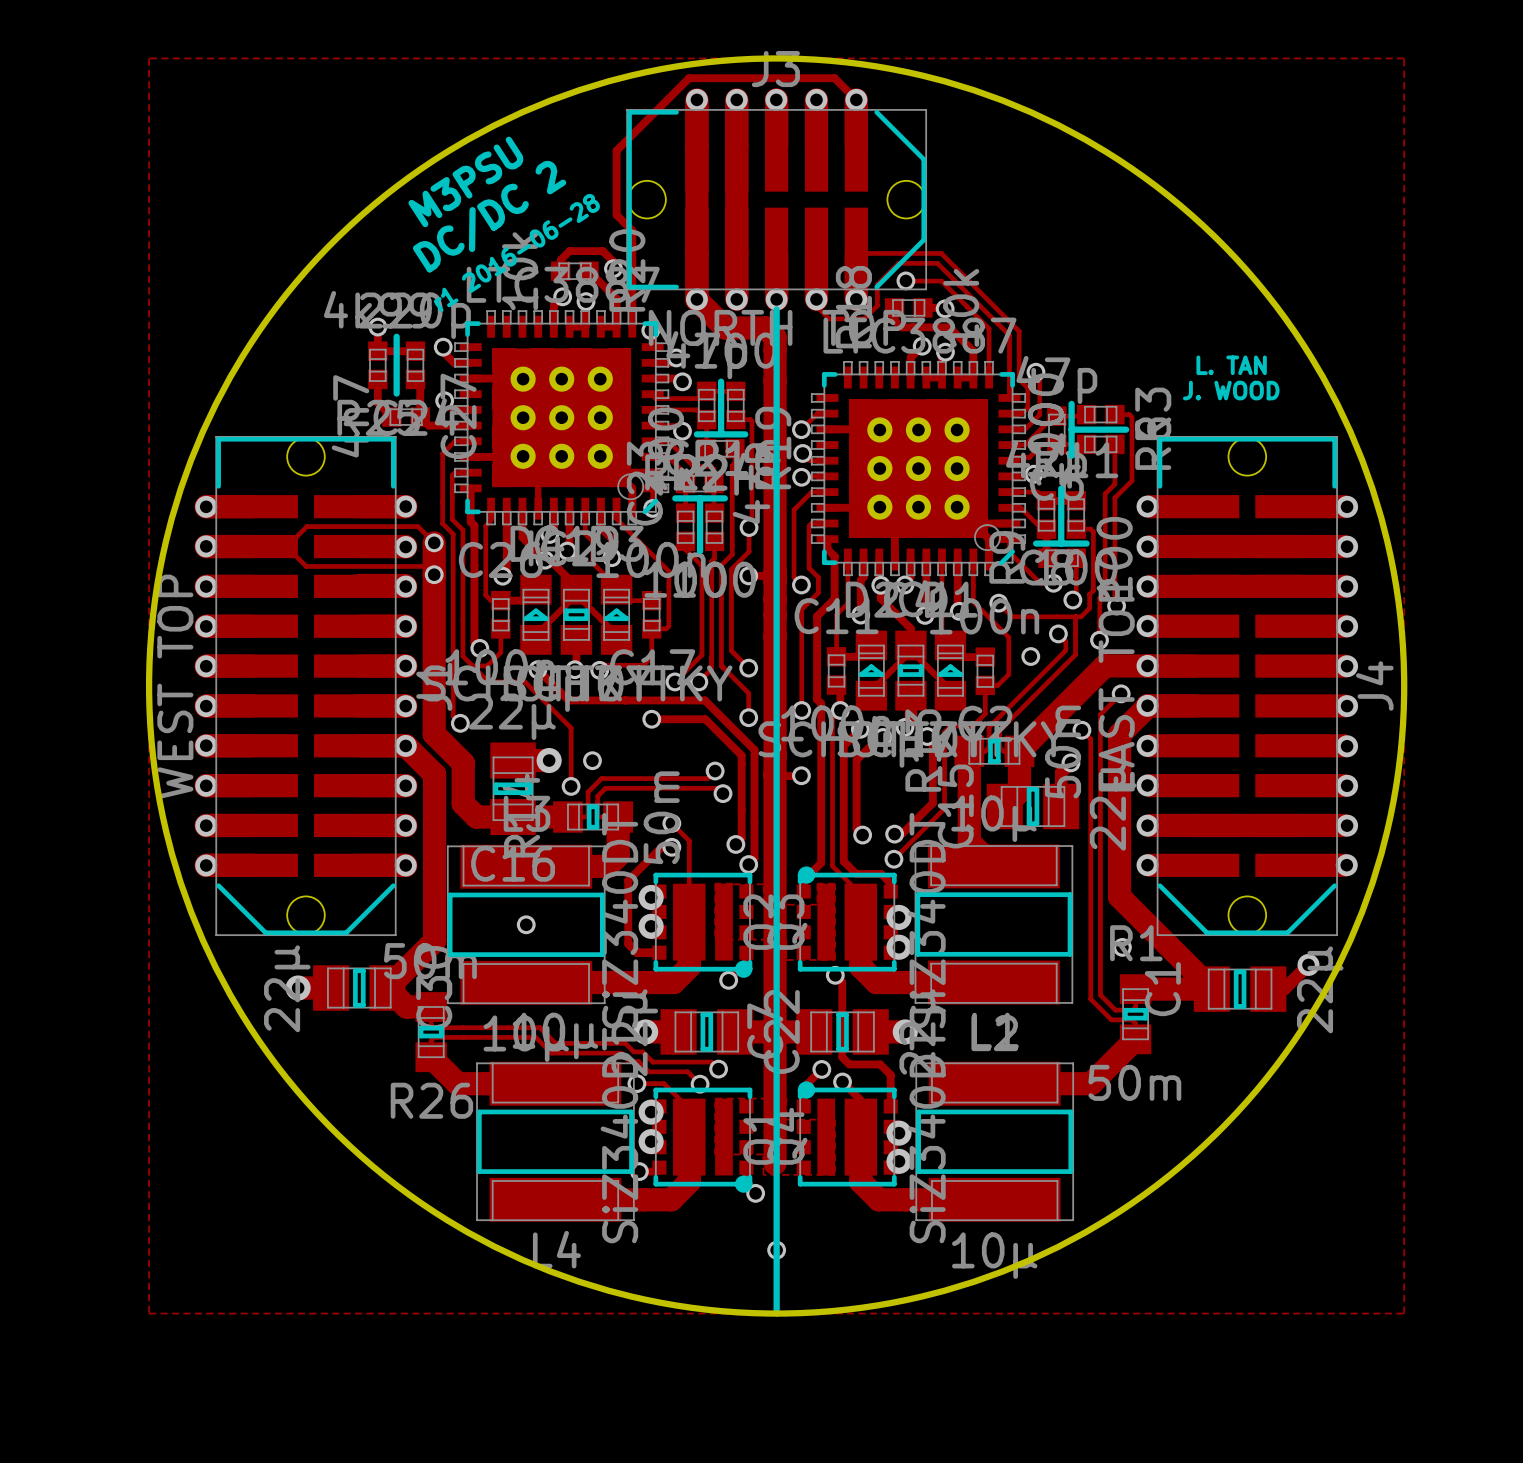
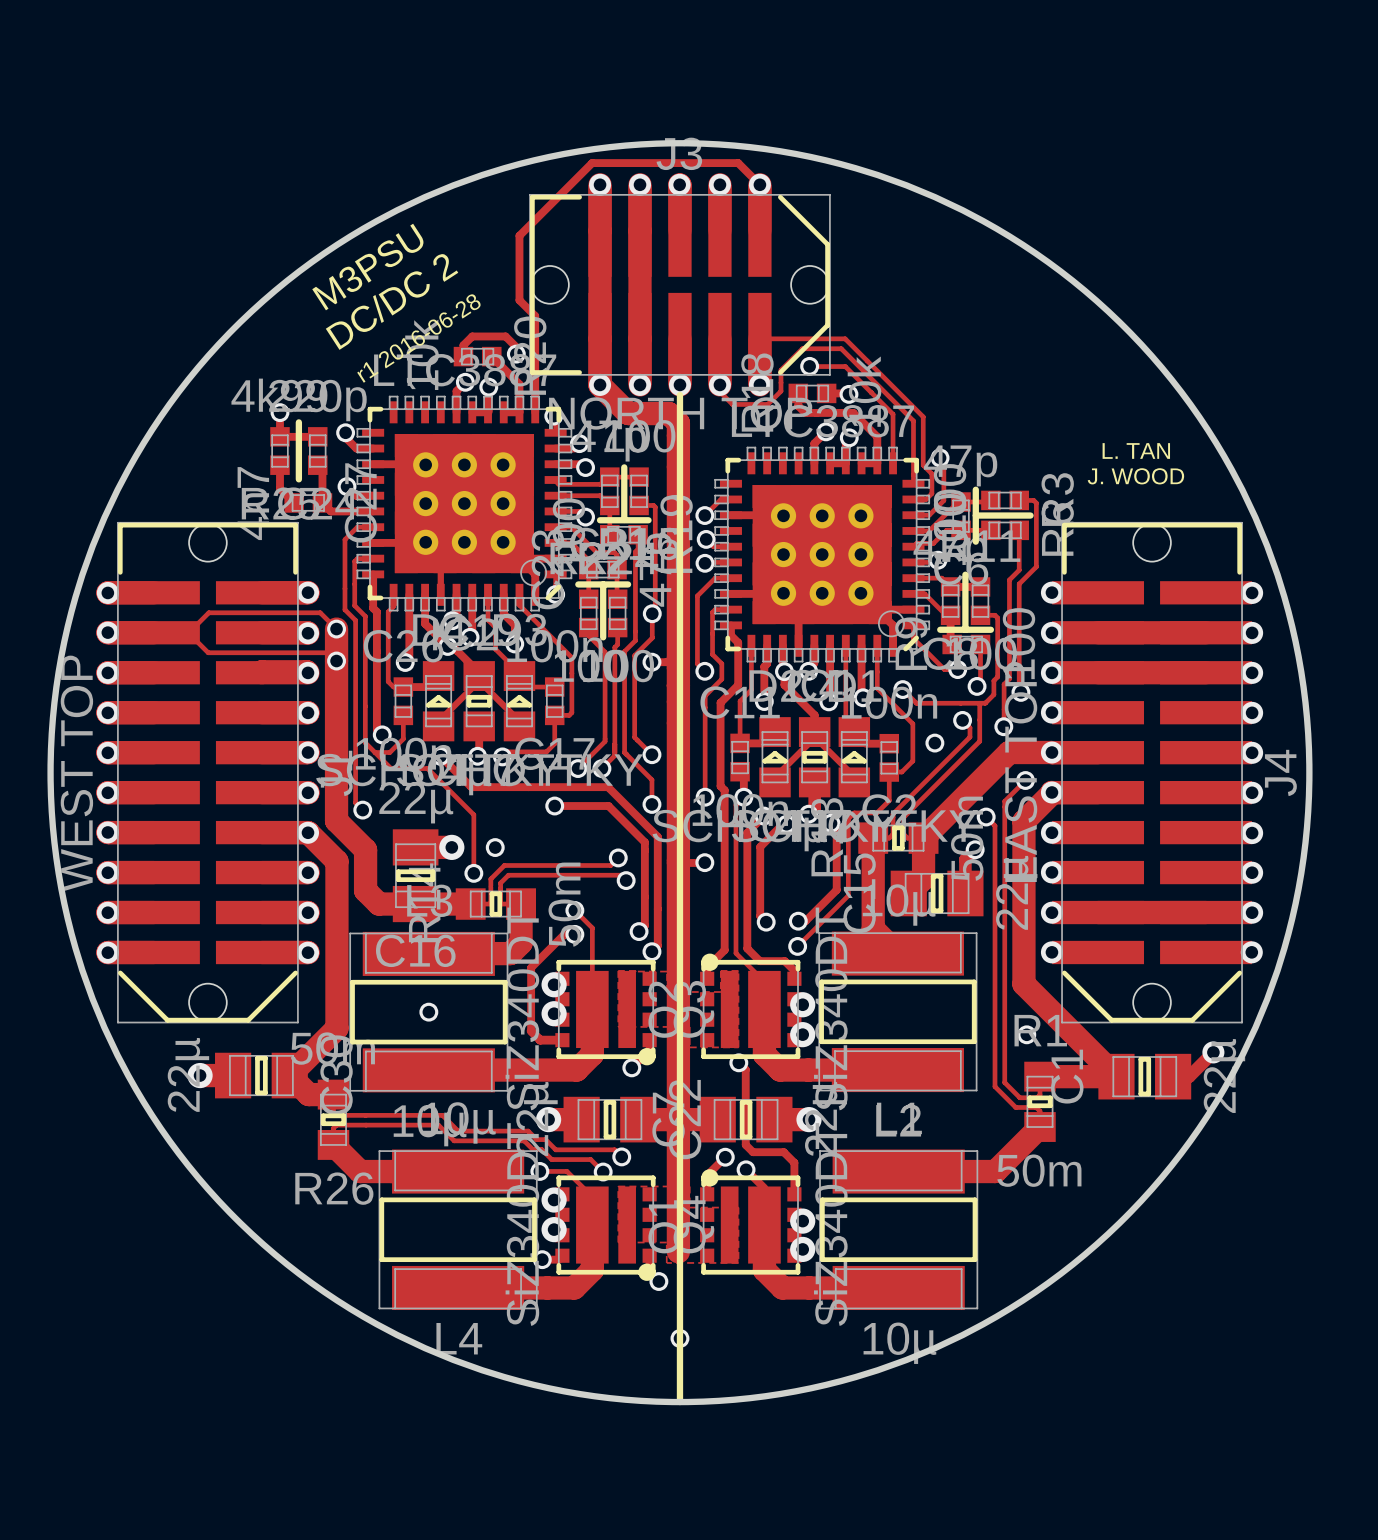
zone outline: (149, 58) (1404, 58) (1404, 1313) (149, 1313) (149, 58) -> none

